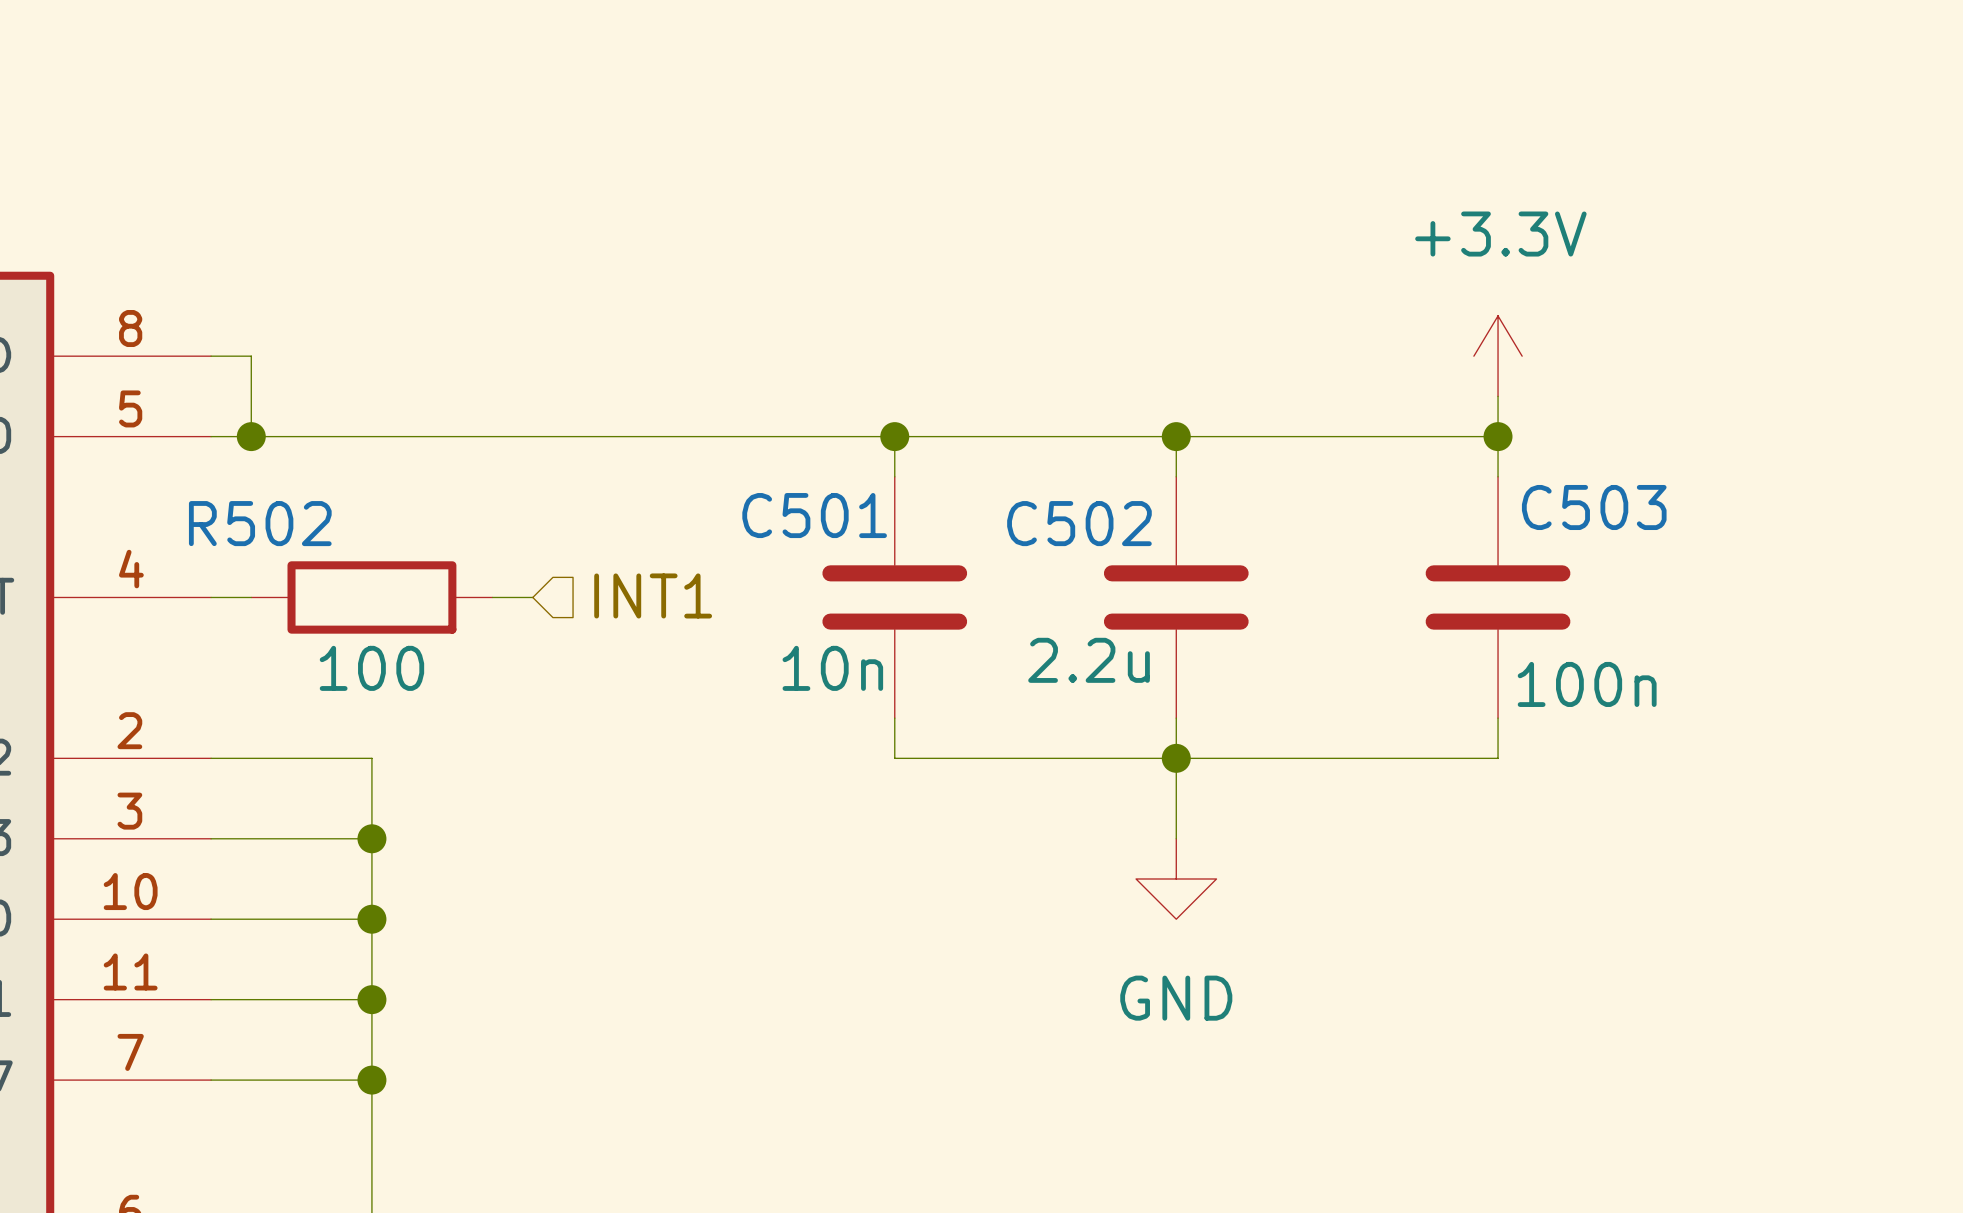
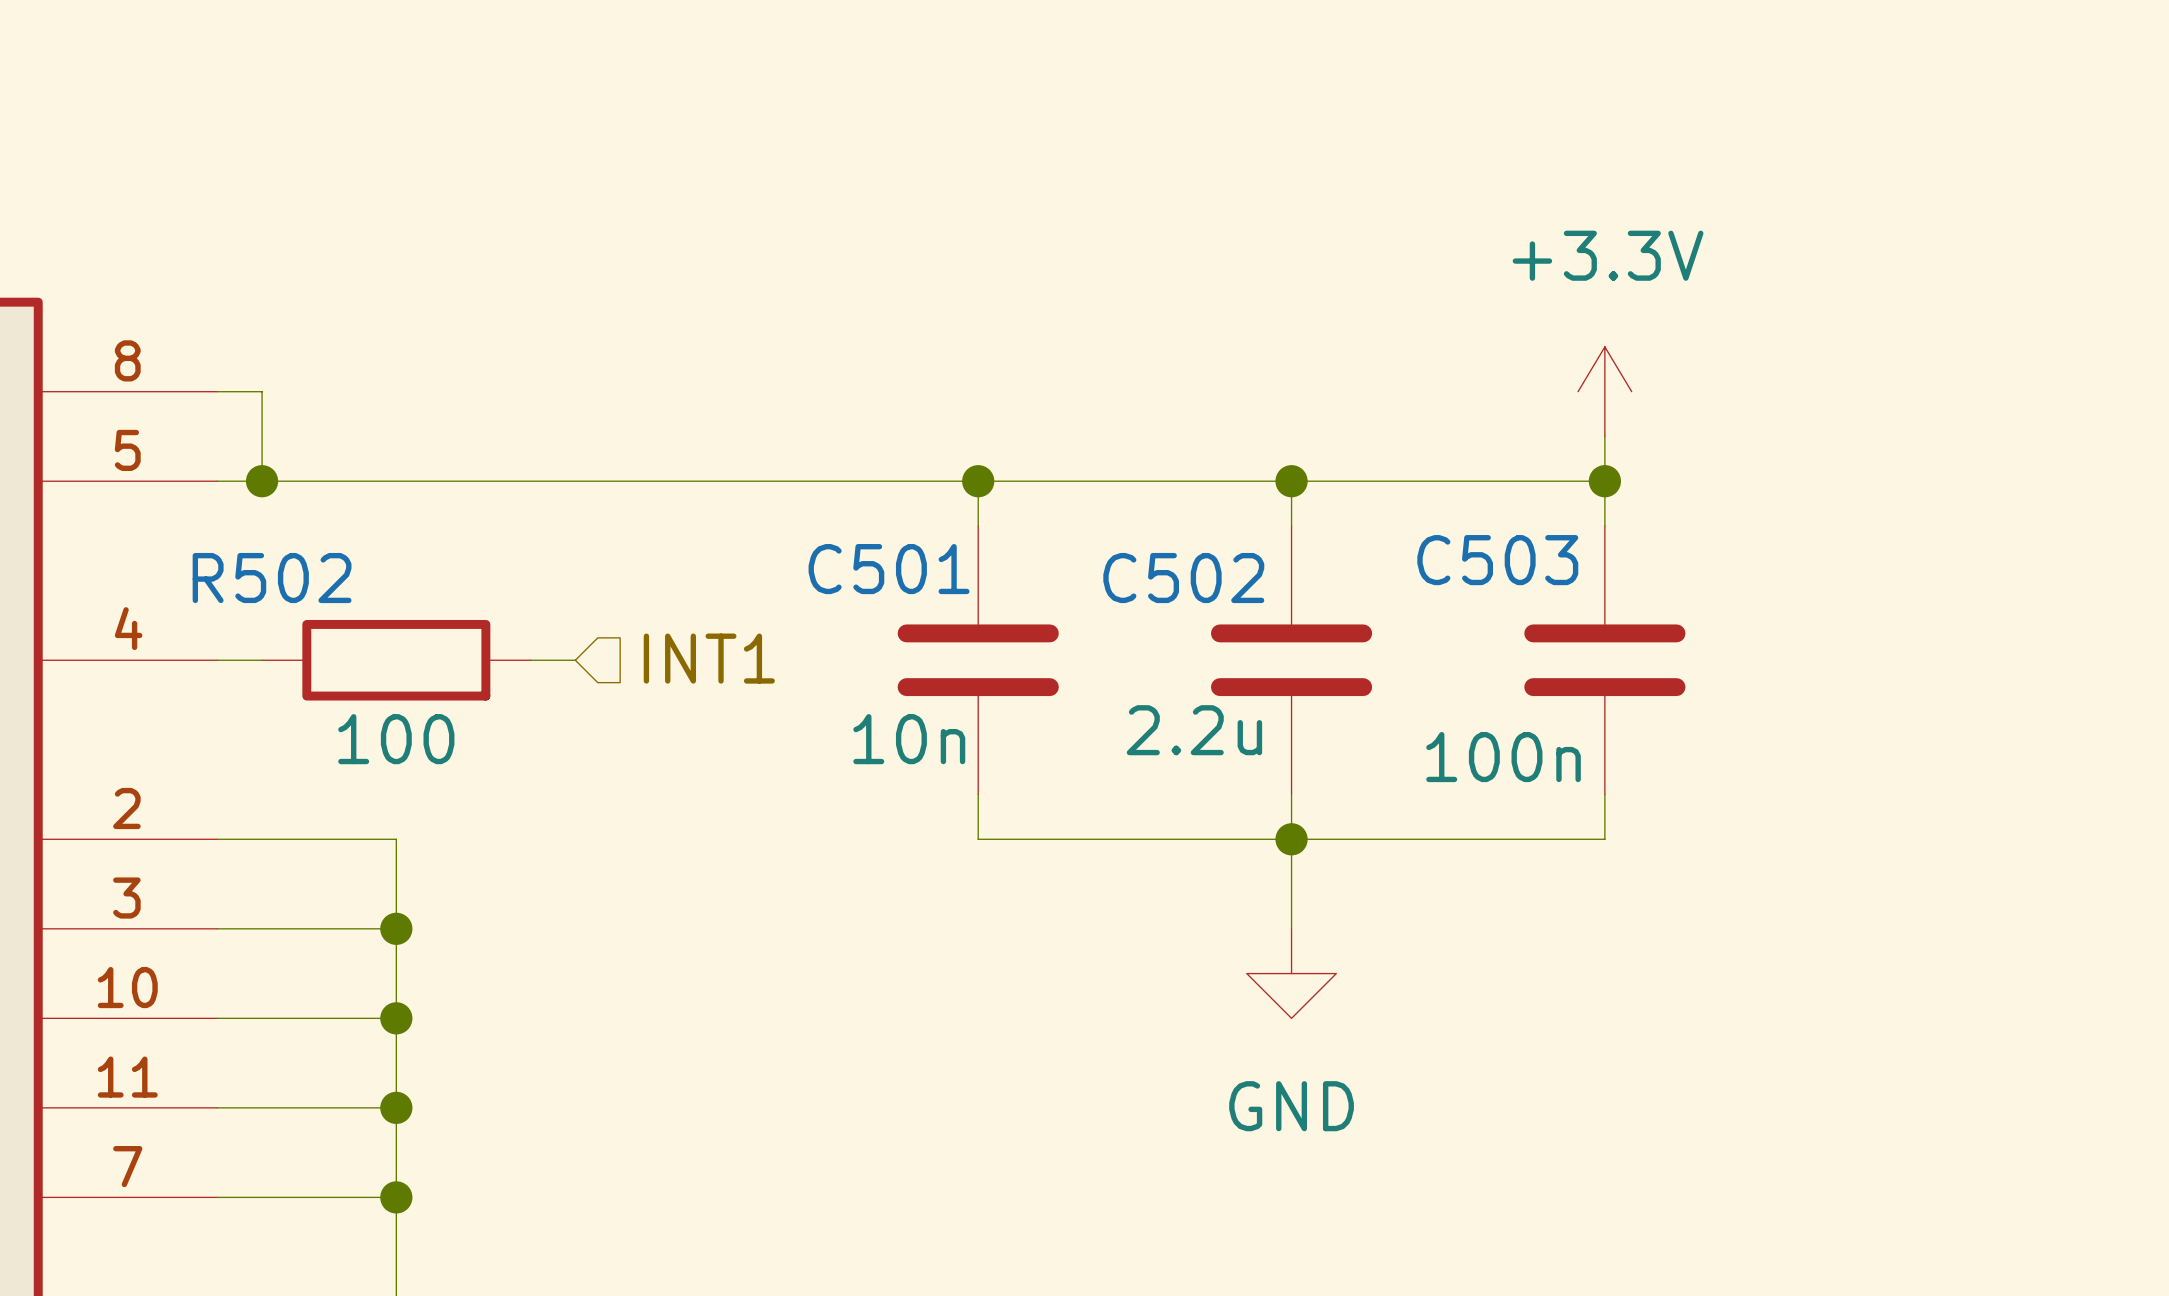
power symbol position: +3.3V (1498, 356) -> +3.3V (1604, 391)
wire: (1498, 396) (1498, 476) -> (1604, 436) (1604, 525)
wire: (1457, 436) (1498, 436) -> none
junction position: (1498, 436) -> (1604, 481)
C503 name position: C503 (1594, 507) -> C503 (1497, 560)
C503 position: (1498, 597) -> (1604, 660)
C503 value position: 100n (1587, 684) -> 100n (1503, 757)
wire: (1498, 718) (1498, 758) (1457, 758) -> (1604, 794) (1604, 839)

